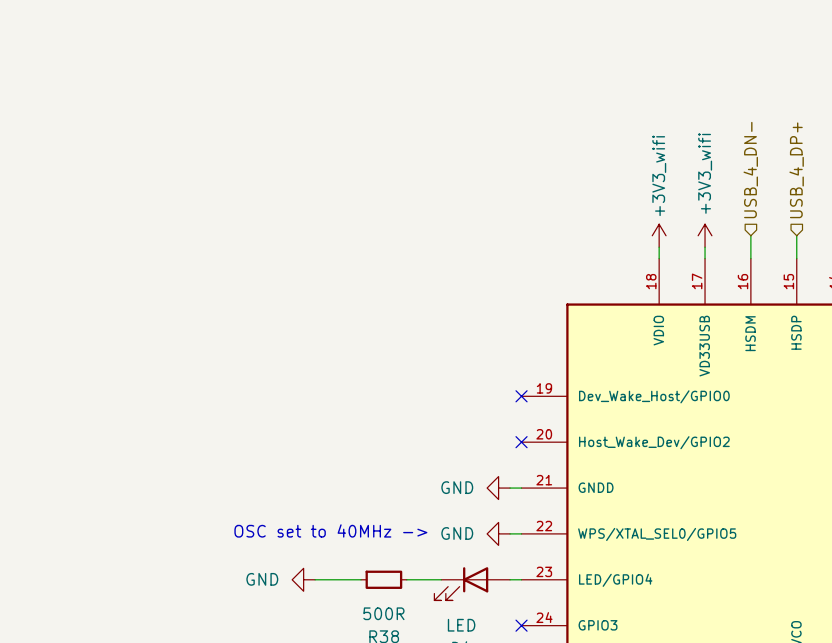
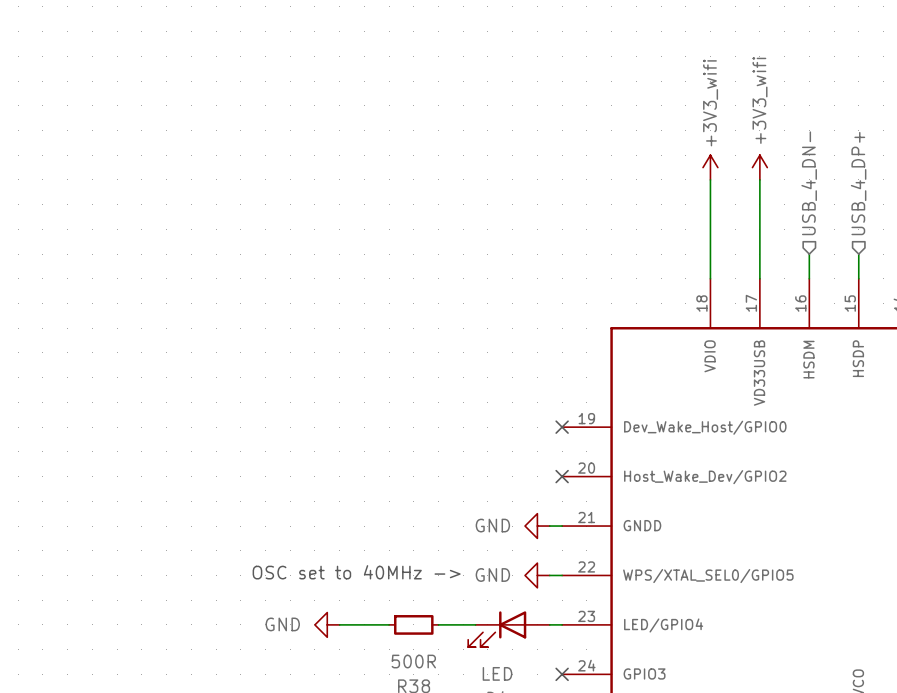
power symbol: none -> +3V3_wifi (710, 167)
power symbol: none -> +3V3_wifi (759, 167)
wire: none -> (710, 179) (710, 266)
wire: none -> (759, 179) (759, 266)
power symbol: +3V3_wifi (659, 235) -> none
power symbol: +3V3_wifi (705, 235) -> none

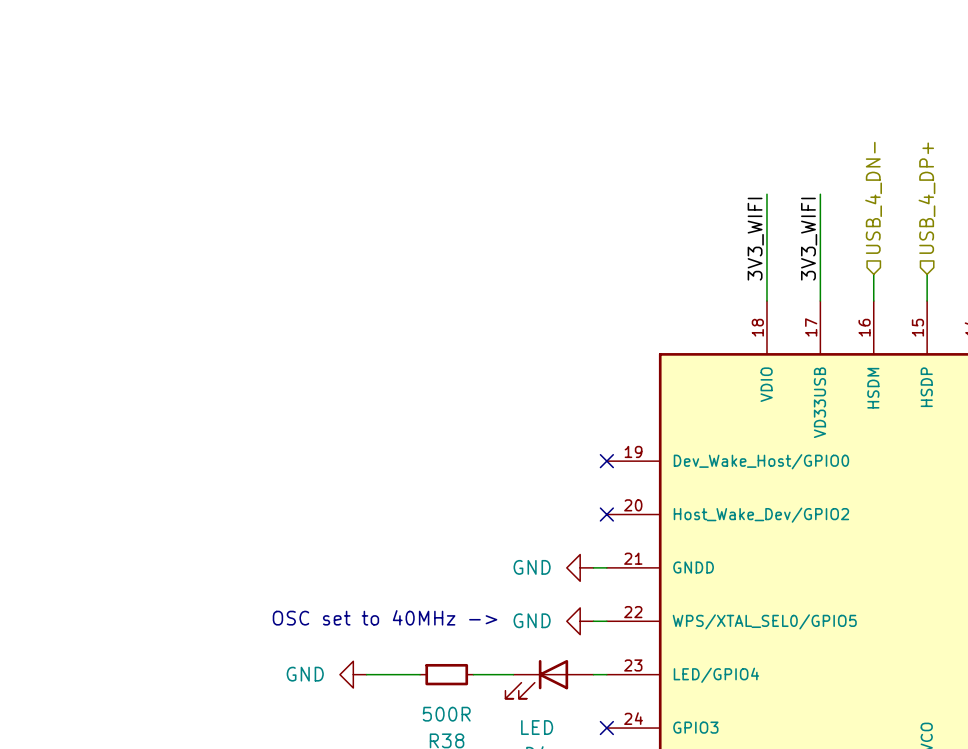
power symbol: +3V3_wifi (710, 167) -> none
power symbol: +3V3_wifi (759, 167) -> none
label: none -> 3V3_WIFI (755, 239)
label: none -> 3V3_WIFI (809, 239)

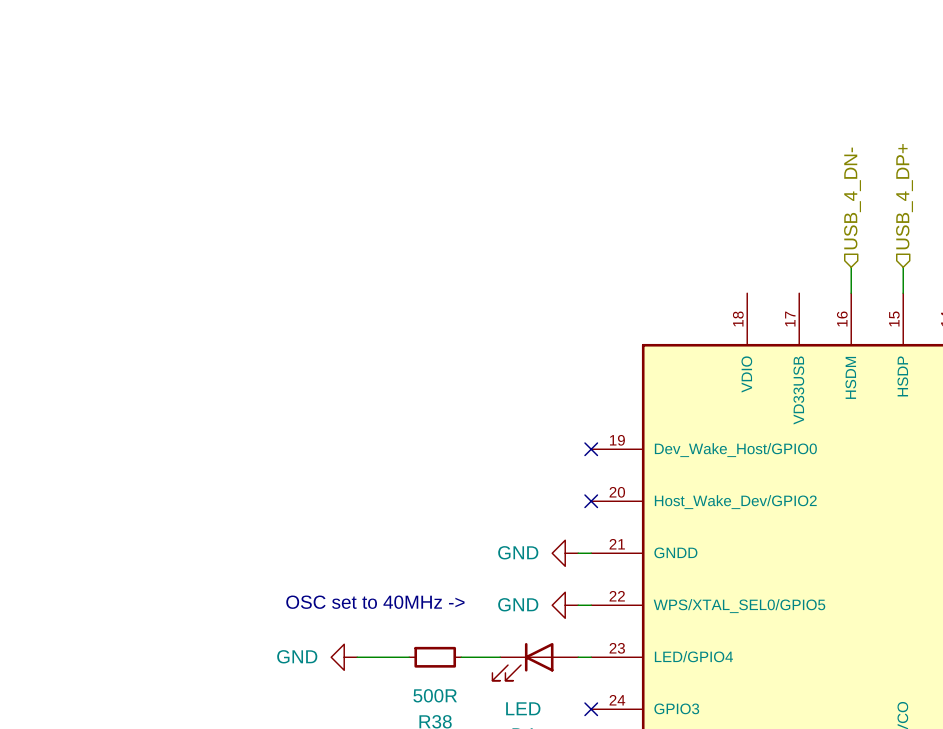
wire: (766, 194) (766, 301) -> none
wire: (820, 194) (820, 301) -> none
label: 3V3_WIFI (755, 239) -> none
label: 3V3_WIFI (809, 239) -> none

